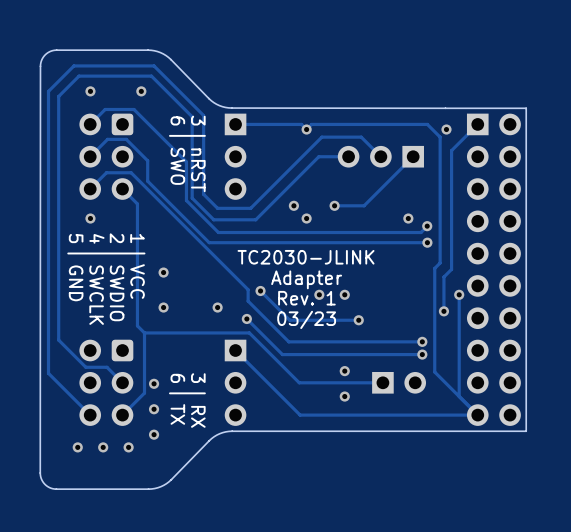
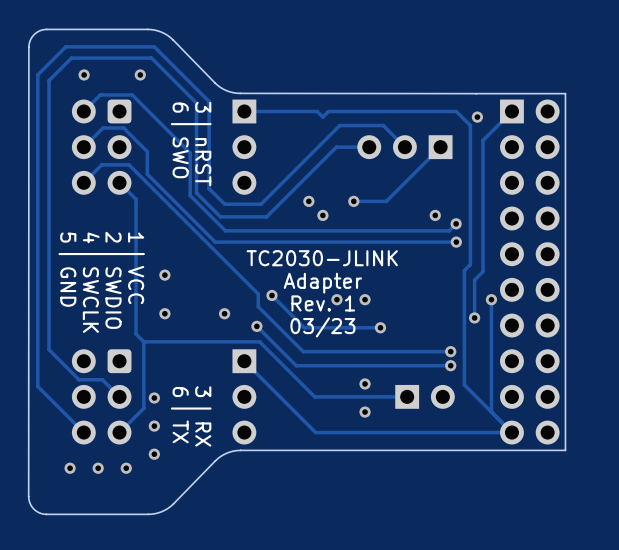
via: (306, 129) -> none
via: (90, 218) -> none

